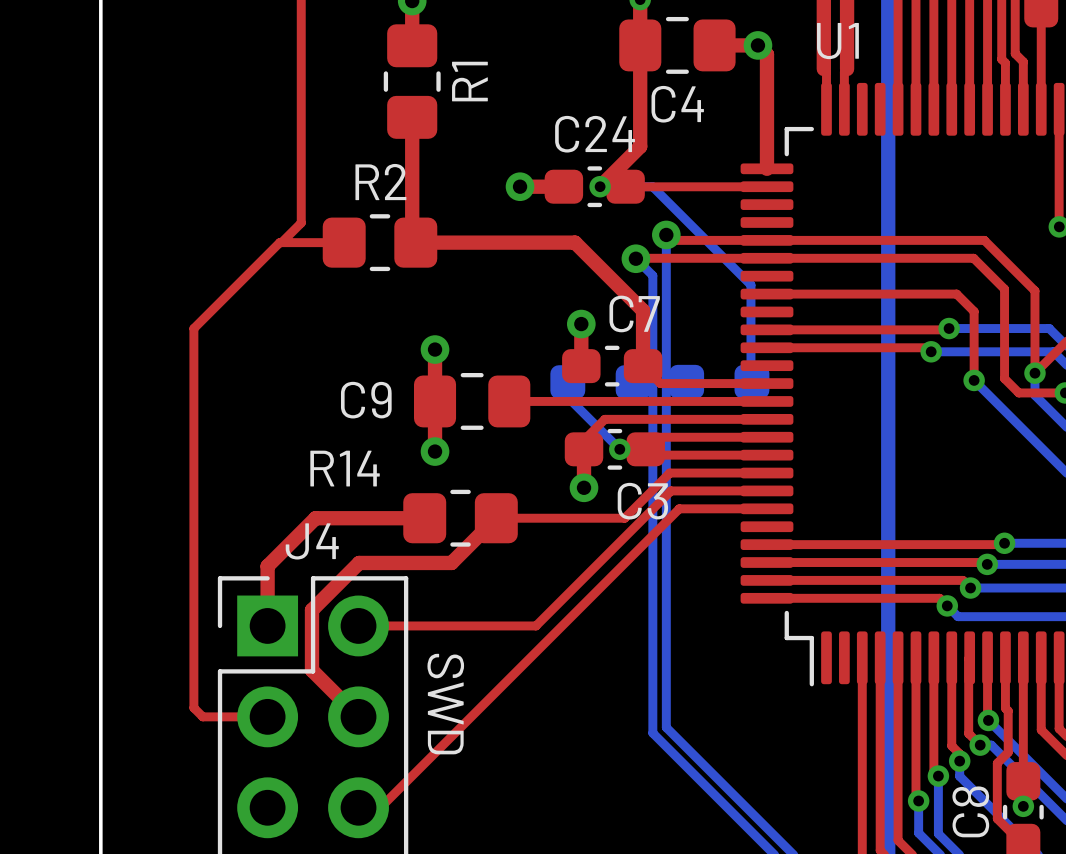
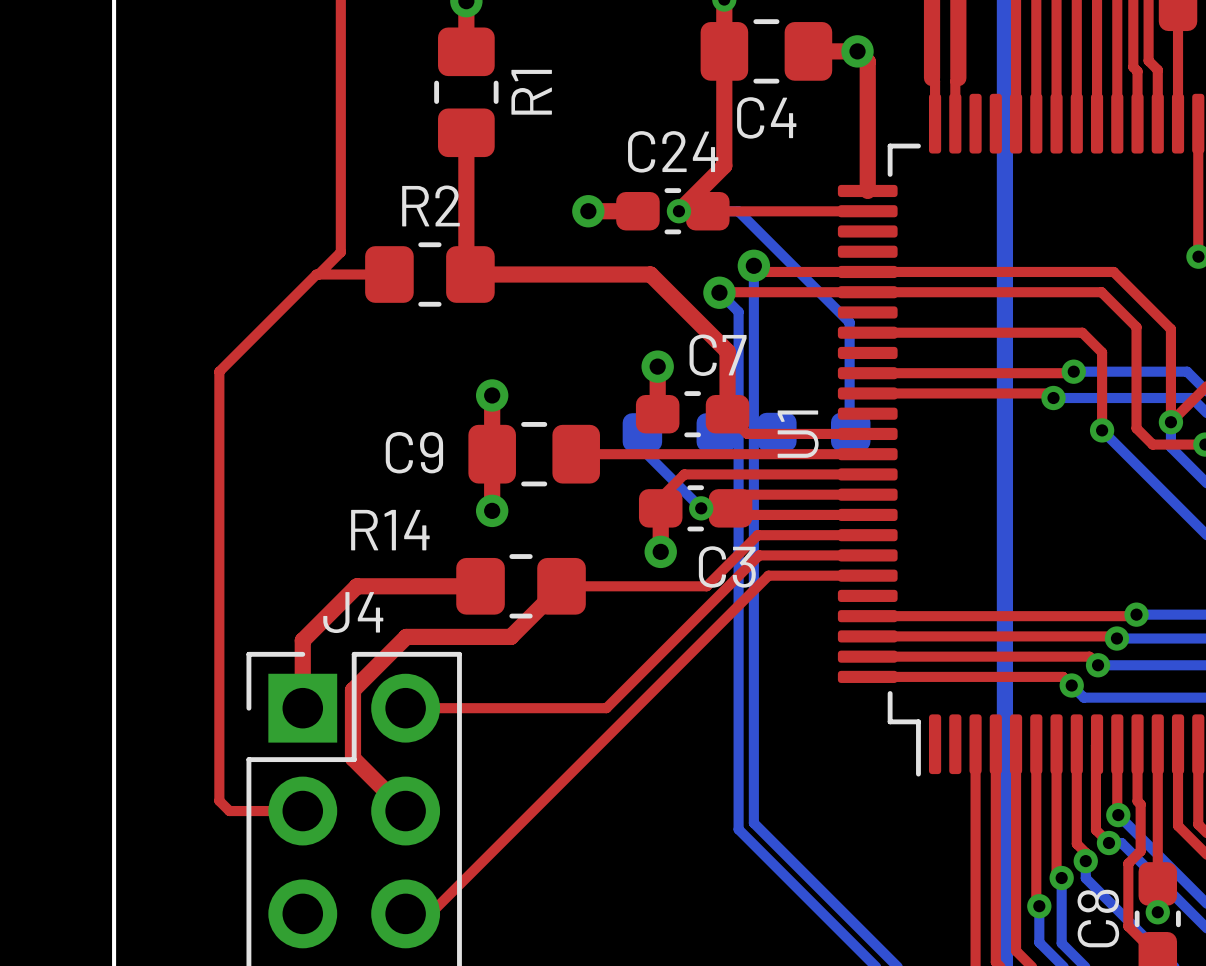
U1 name rotation: 0° (837, 41) -> 90° counterclockwise (798, 434)
U1 name position: U1 (837, 41) -> U1 (798, 434)
text: SWD (445, 704) -> none

